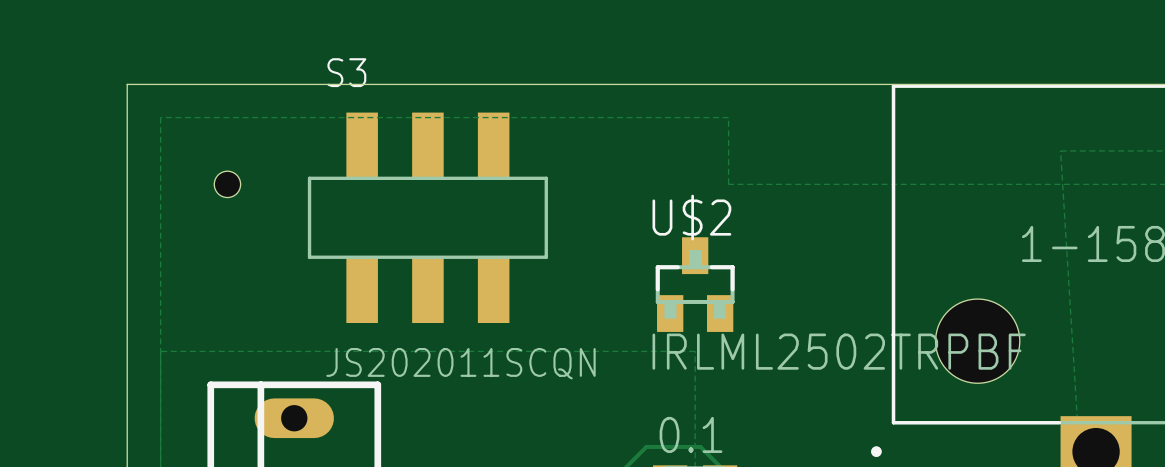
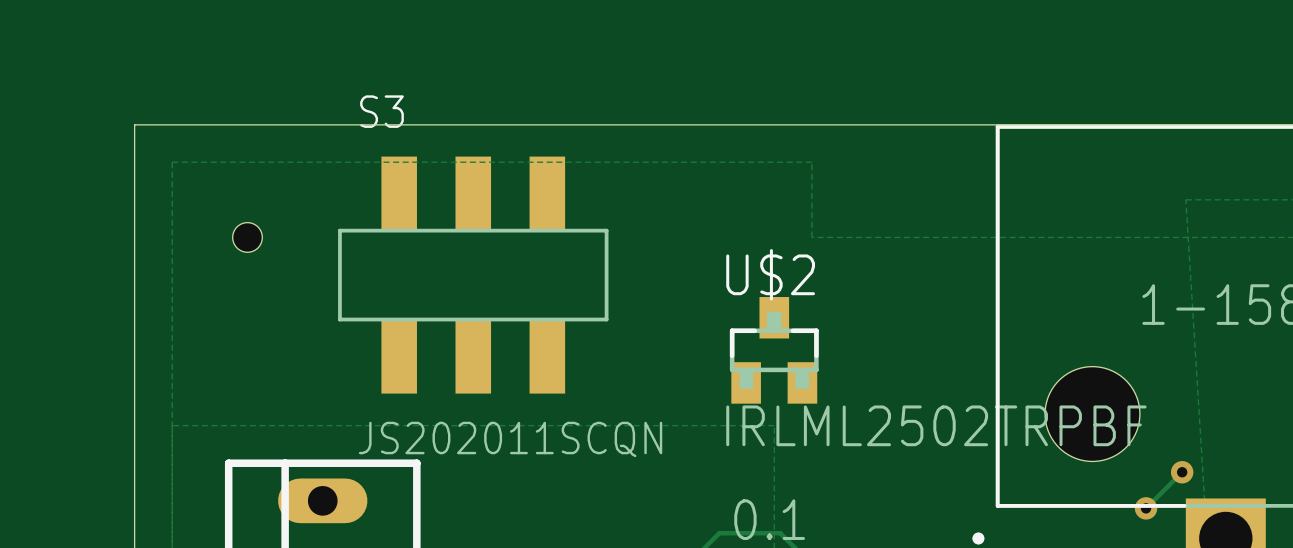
track: none -> (1182, 472) (1146, 508)
via: none -> (1182, 472)
via: none -> (1146, 508)

